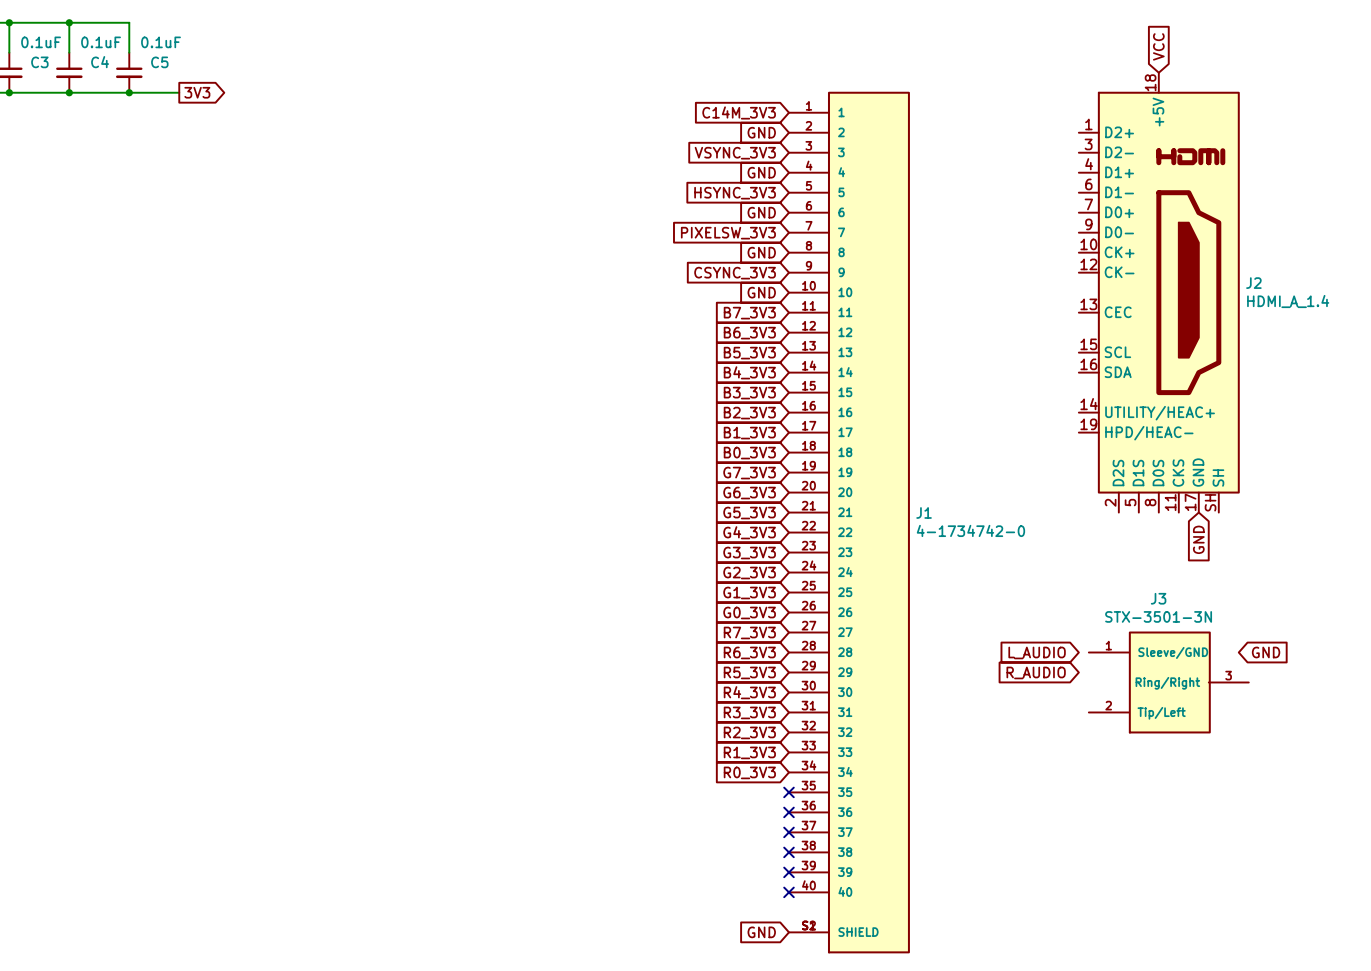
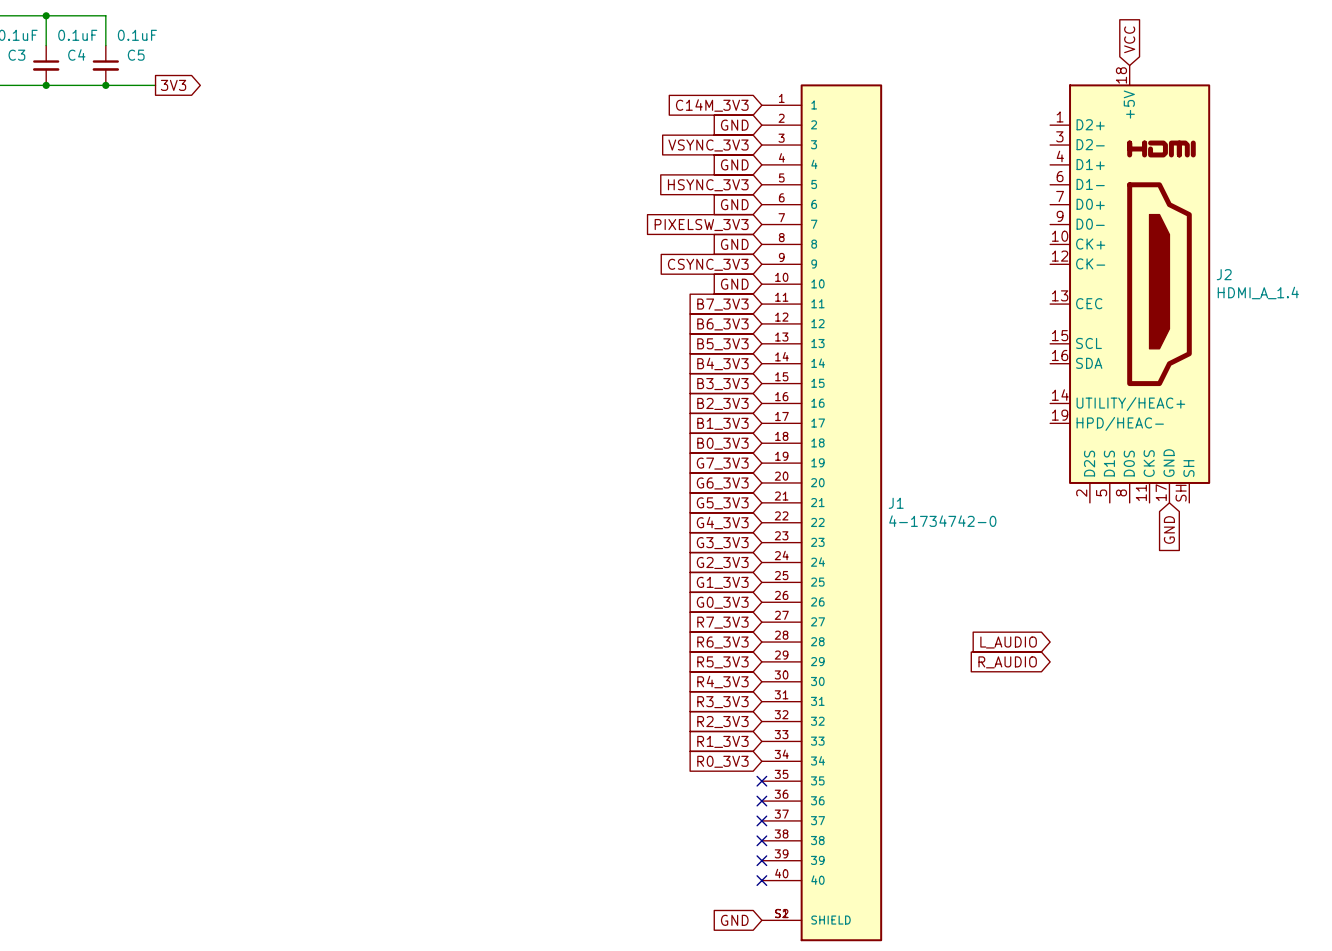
global label: GND (1266, 652) -> none
J3: STX-3501-3N (1168, 682) -> none

